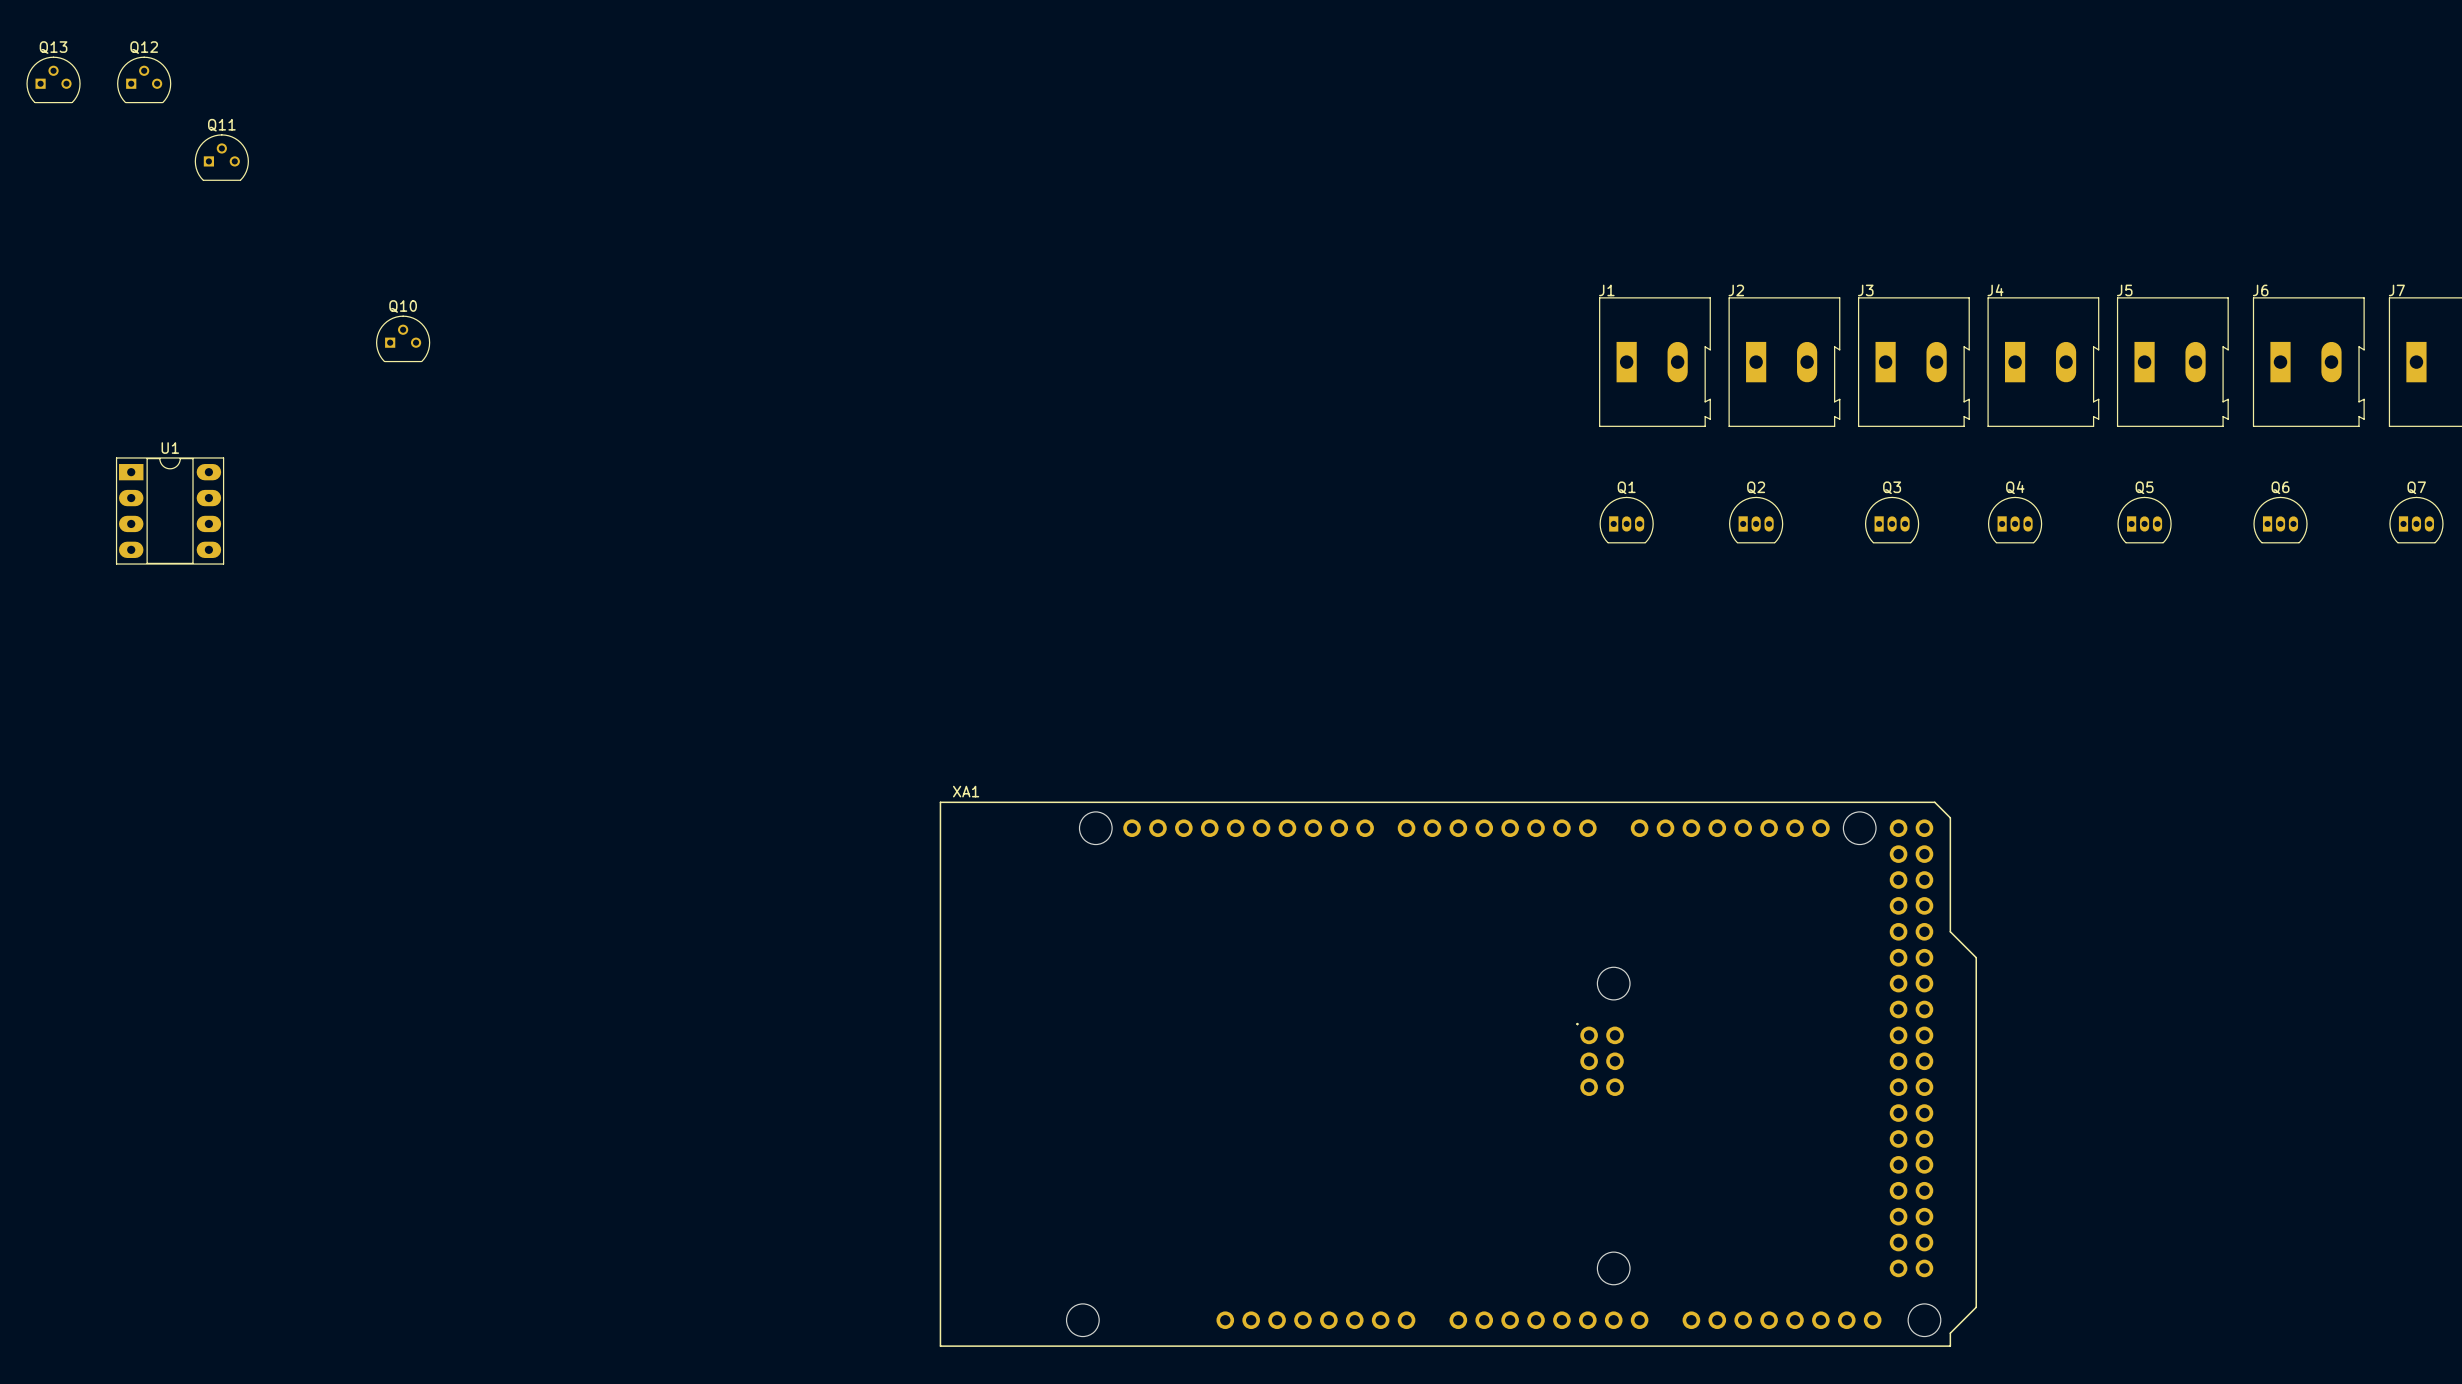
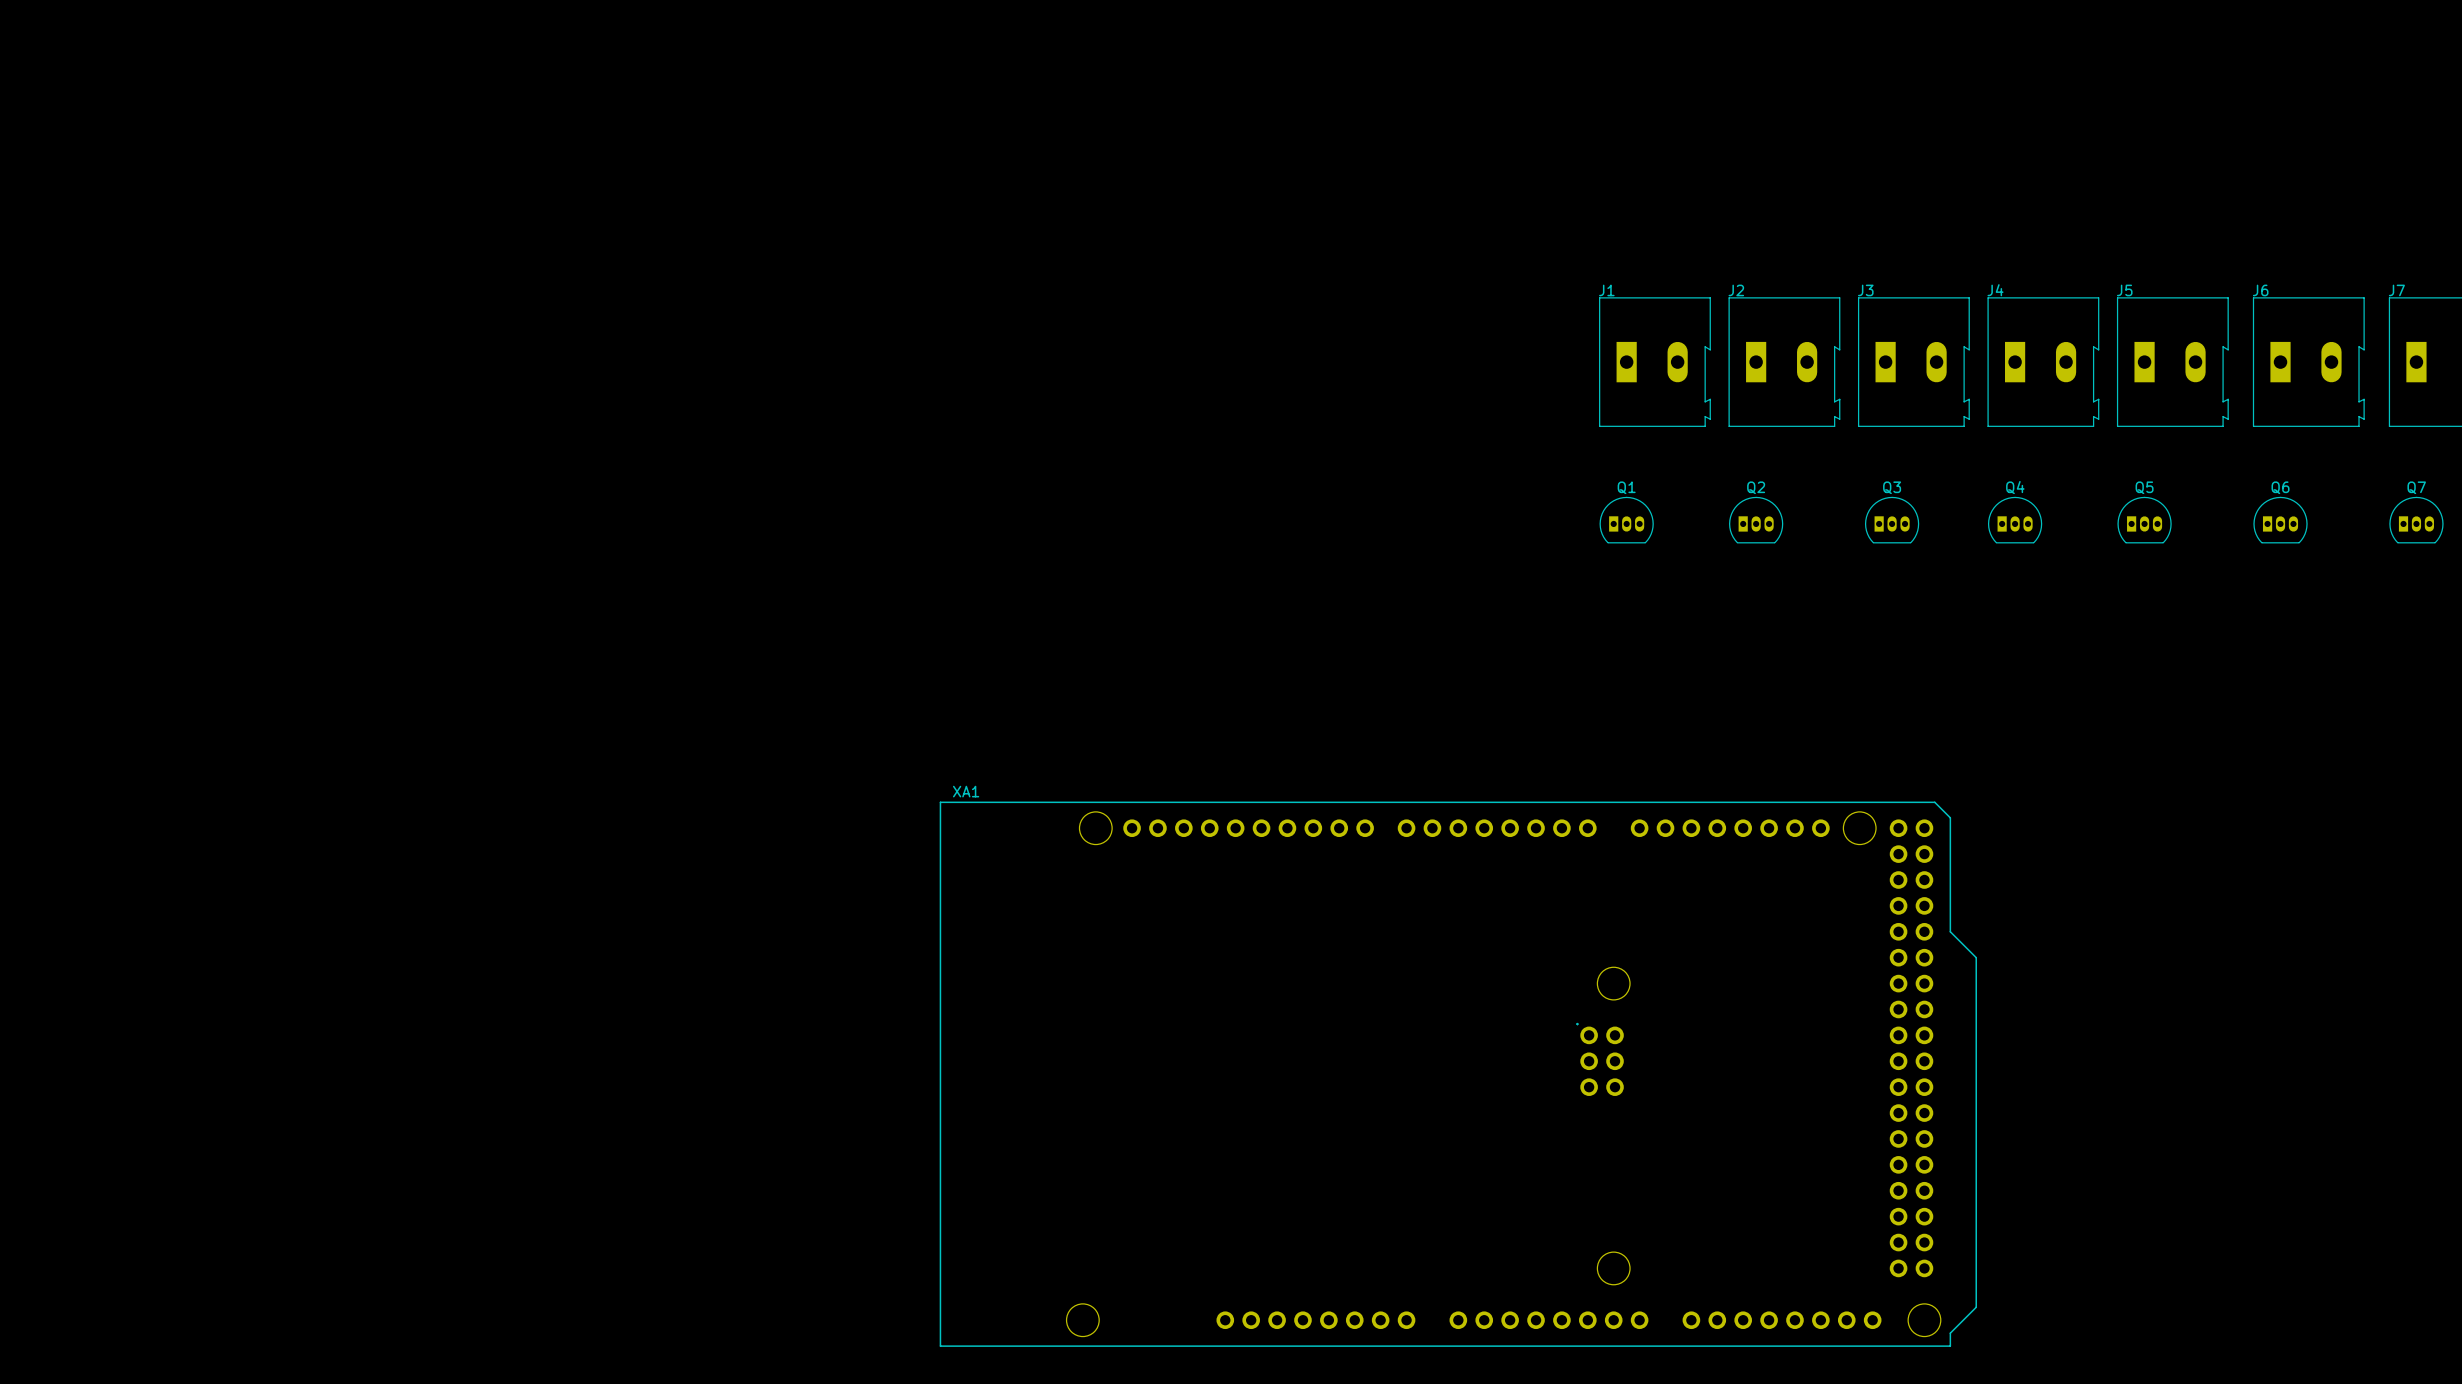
Q13: (53, 79) -> none
Q12: (144, 79) -> none
Q11: (221, 157) -> none
Q10: (403, 338) -> none
U1: (170, 511) -> none

